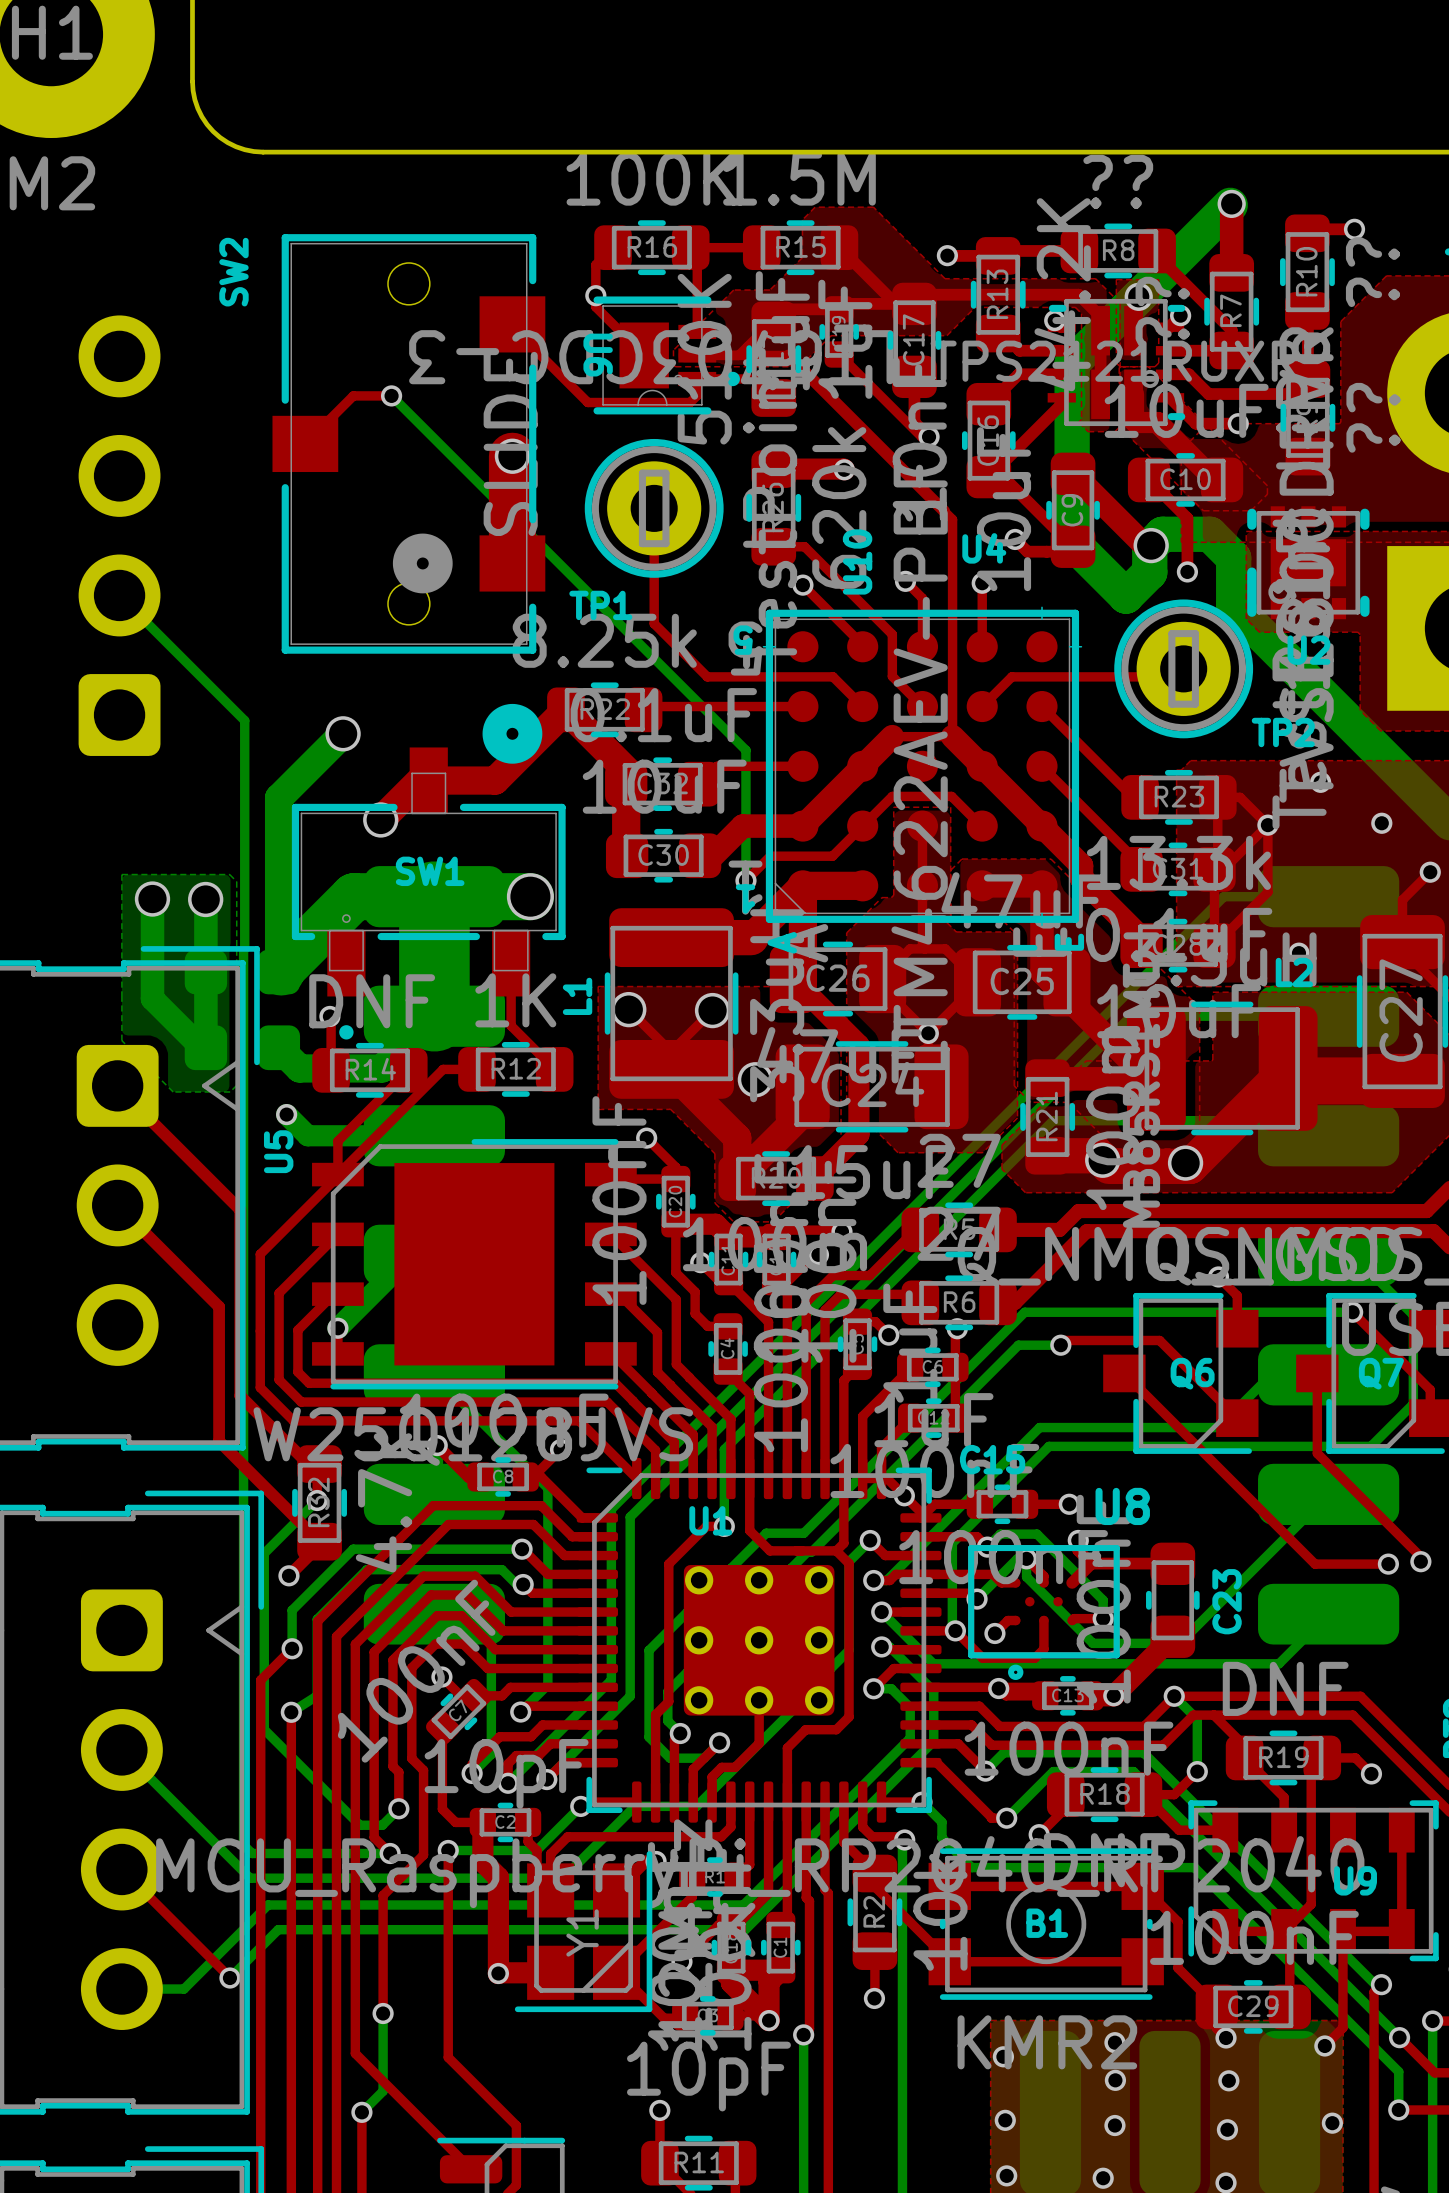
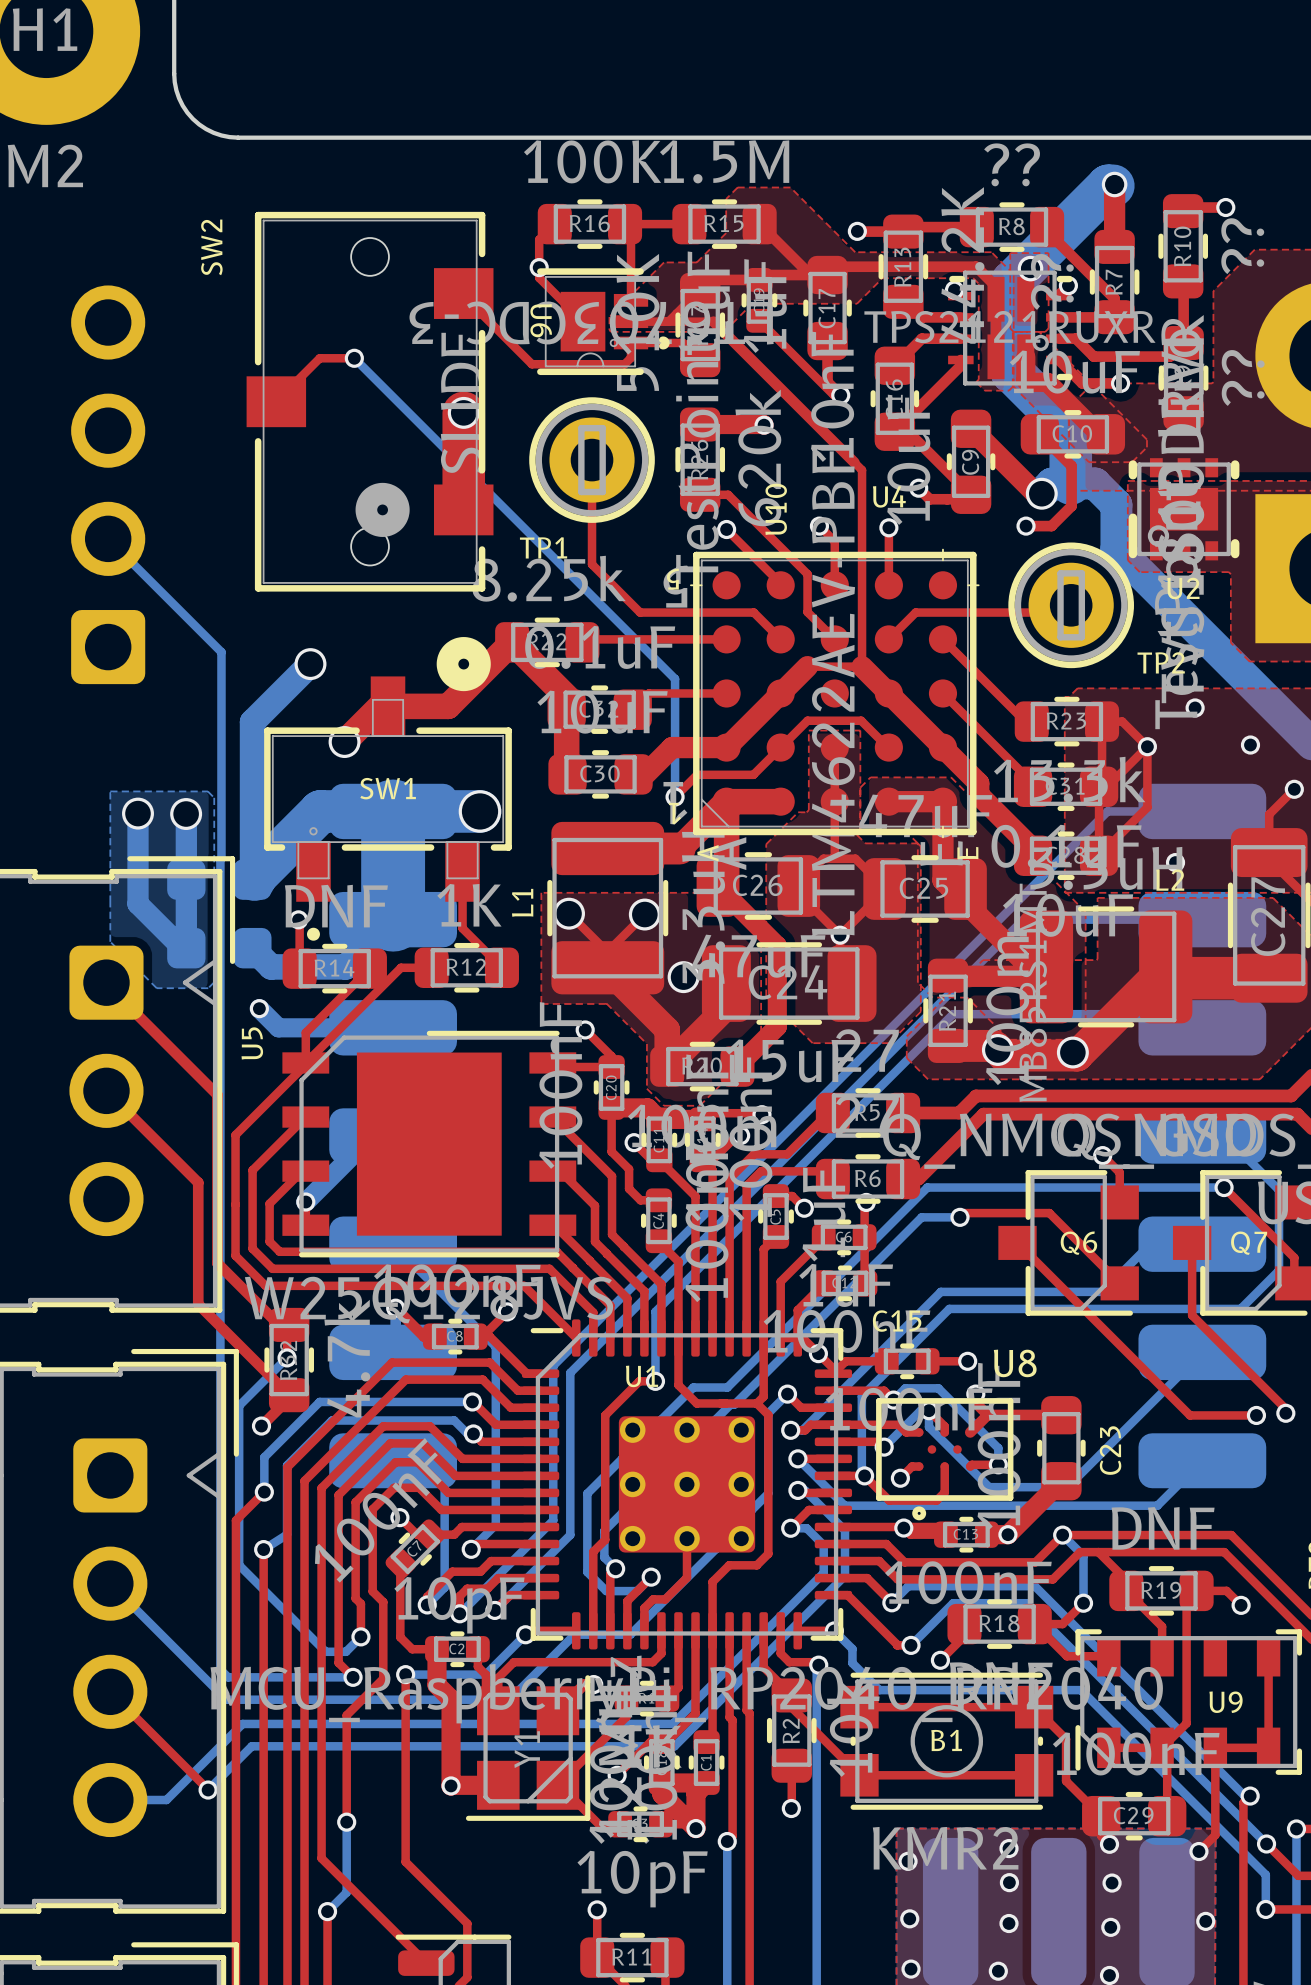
bottom track: (1230, 205) (1072, 363) (1072, 542) (1126, 596) (1149, 572) (1151, 545) -> (1113, 185) (1108, 185) (1011, 282) (1011, 371) (1070, 430) (1070, 483)
top track: (1184, 514) (1187, 518) (1187, 571) -> (1071, 466) (1071, 506) (1051, 526) (1026, 526)
via position: (1187, 571) -> (1026, 526)

